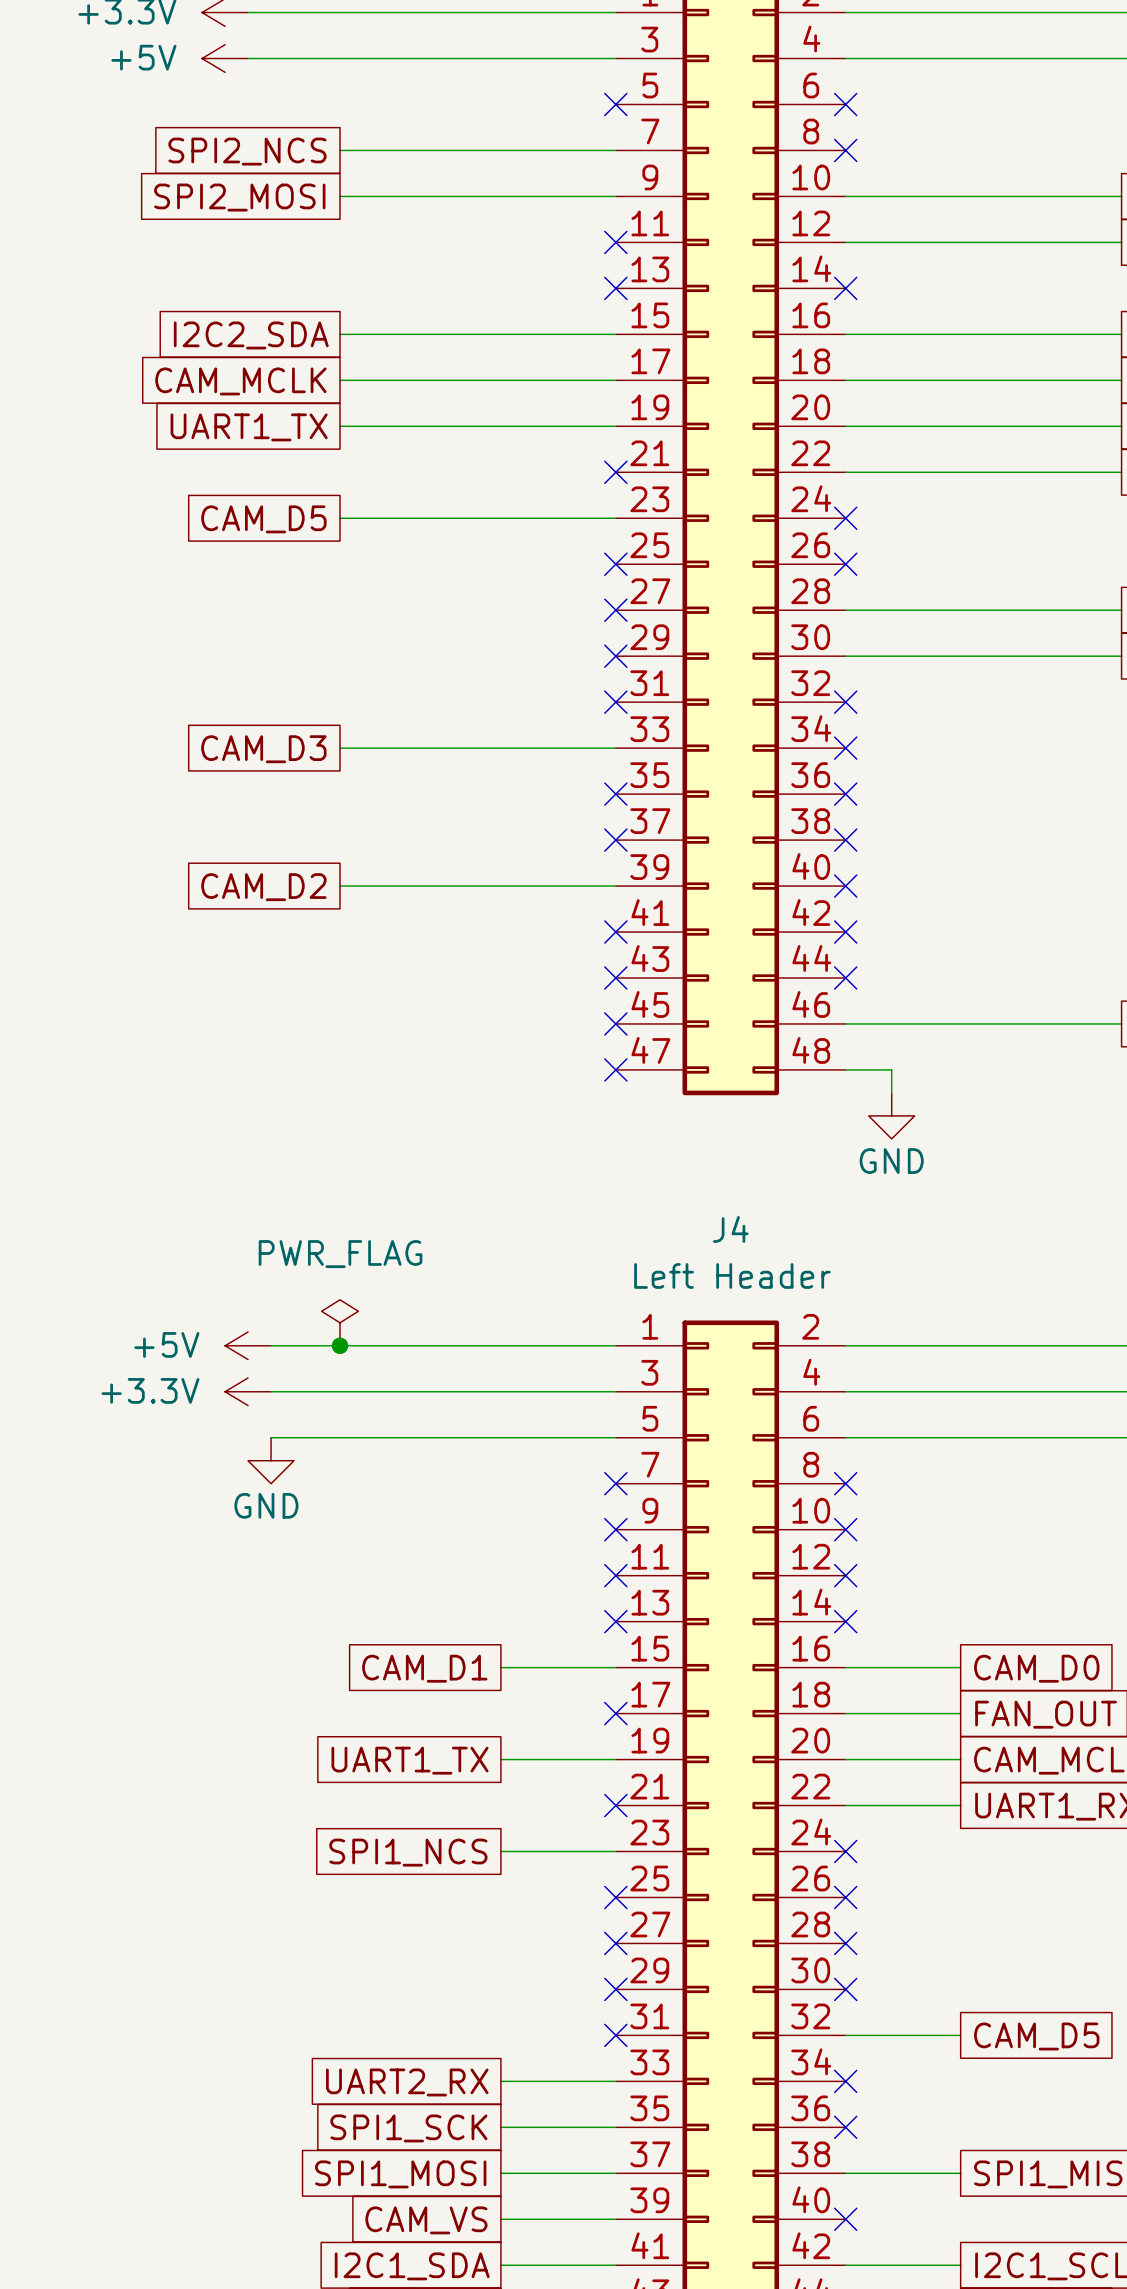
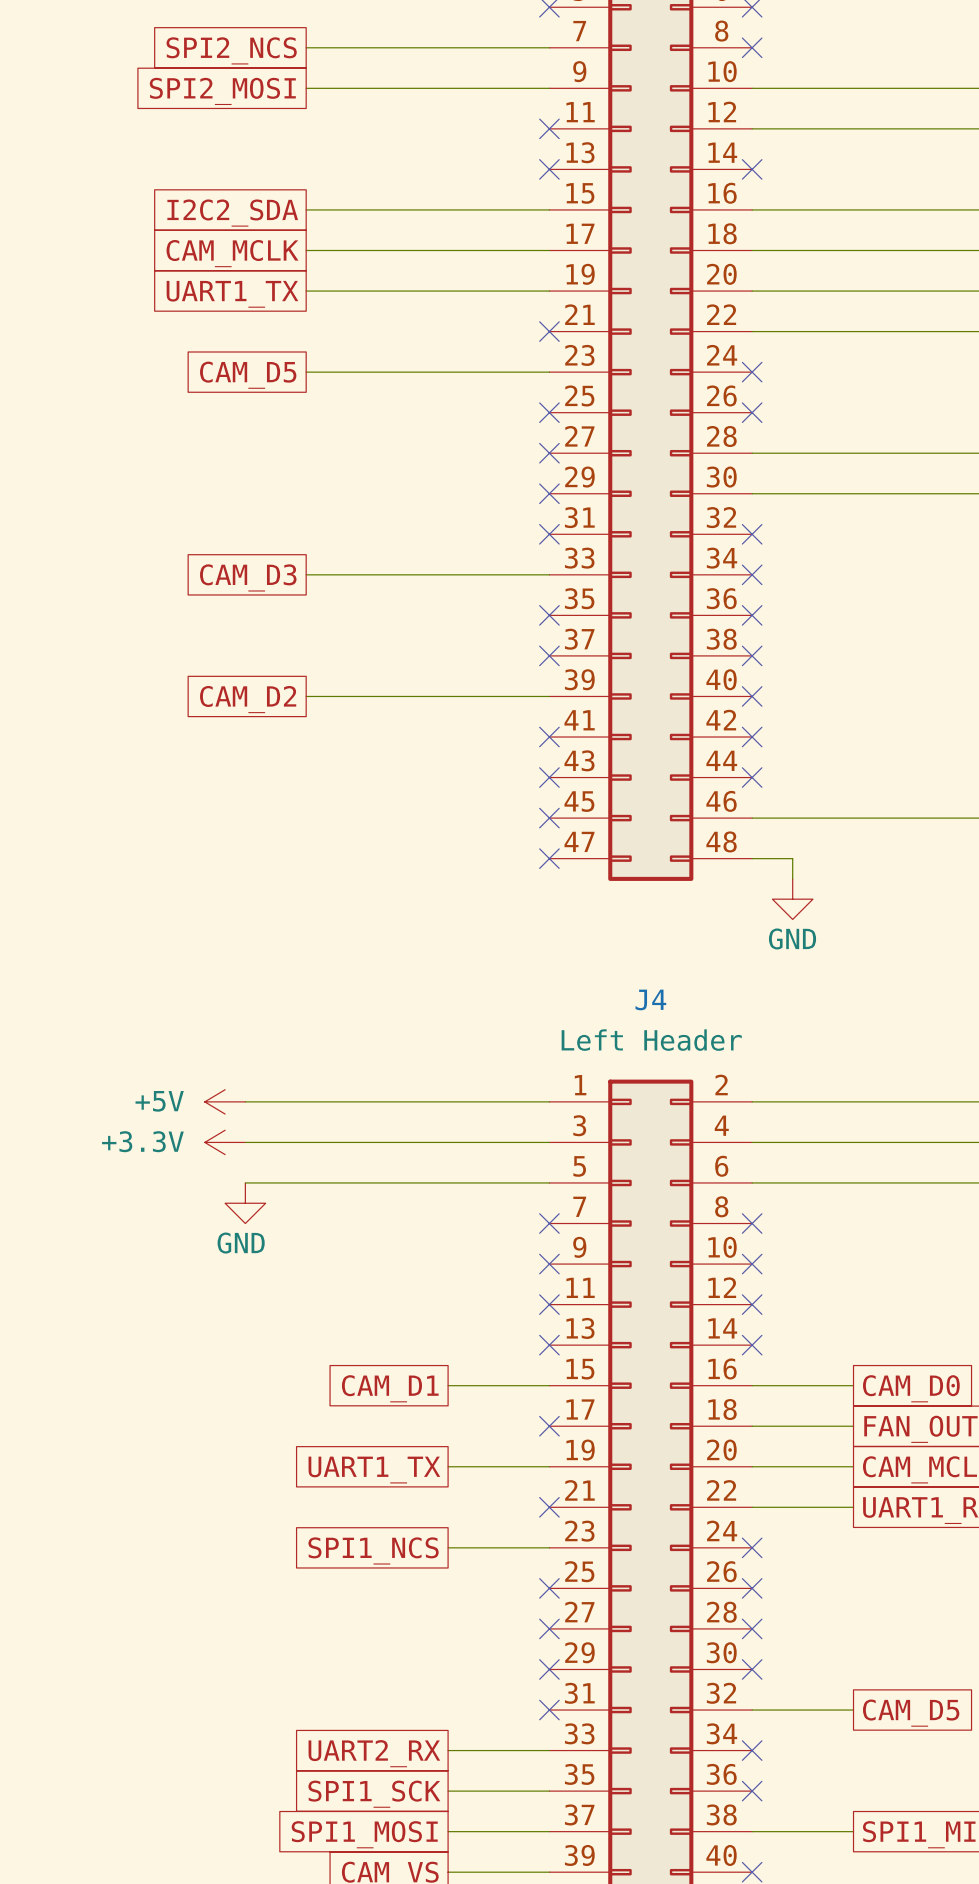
power symbol: PWR_FLAG (340, 1322) -> none
junction: (340, 1345) -> none

